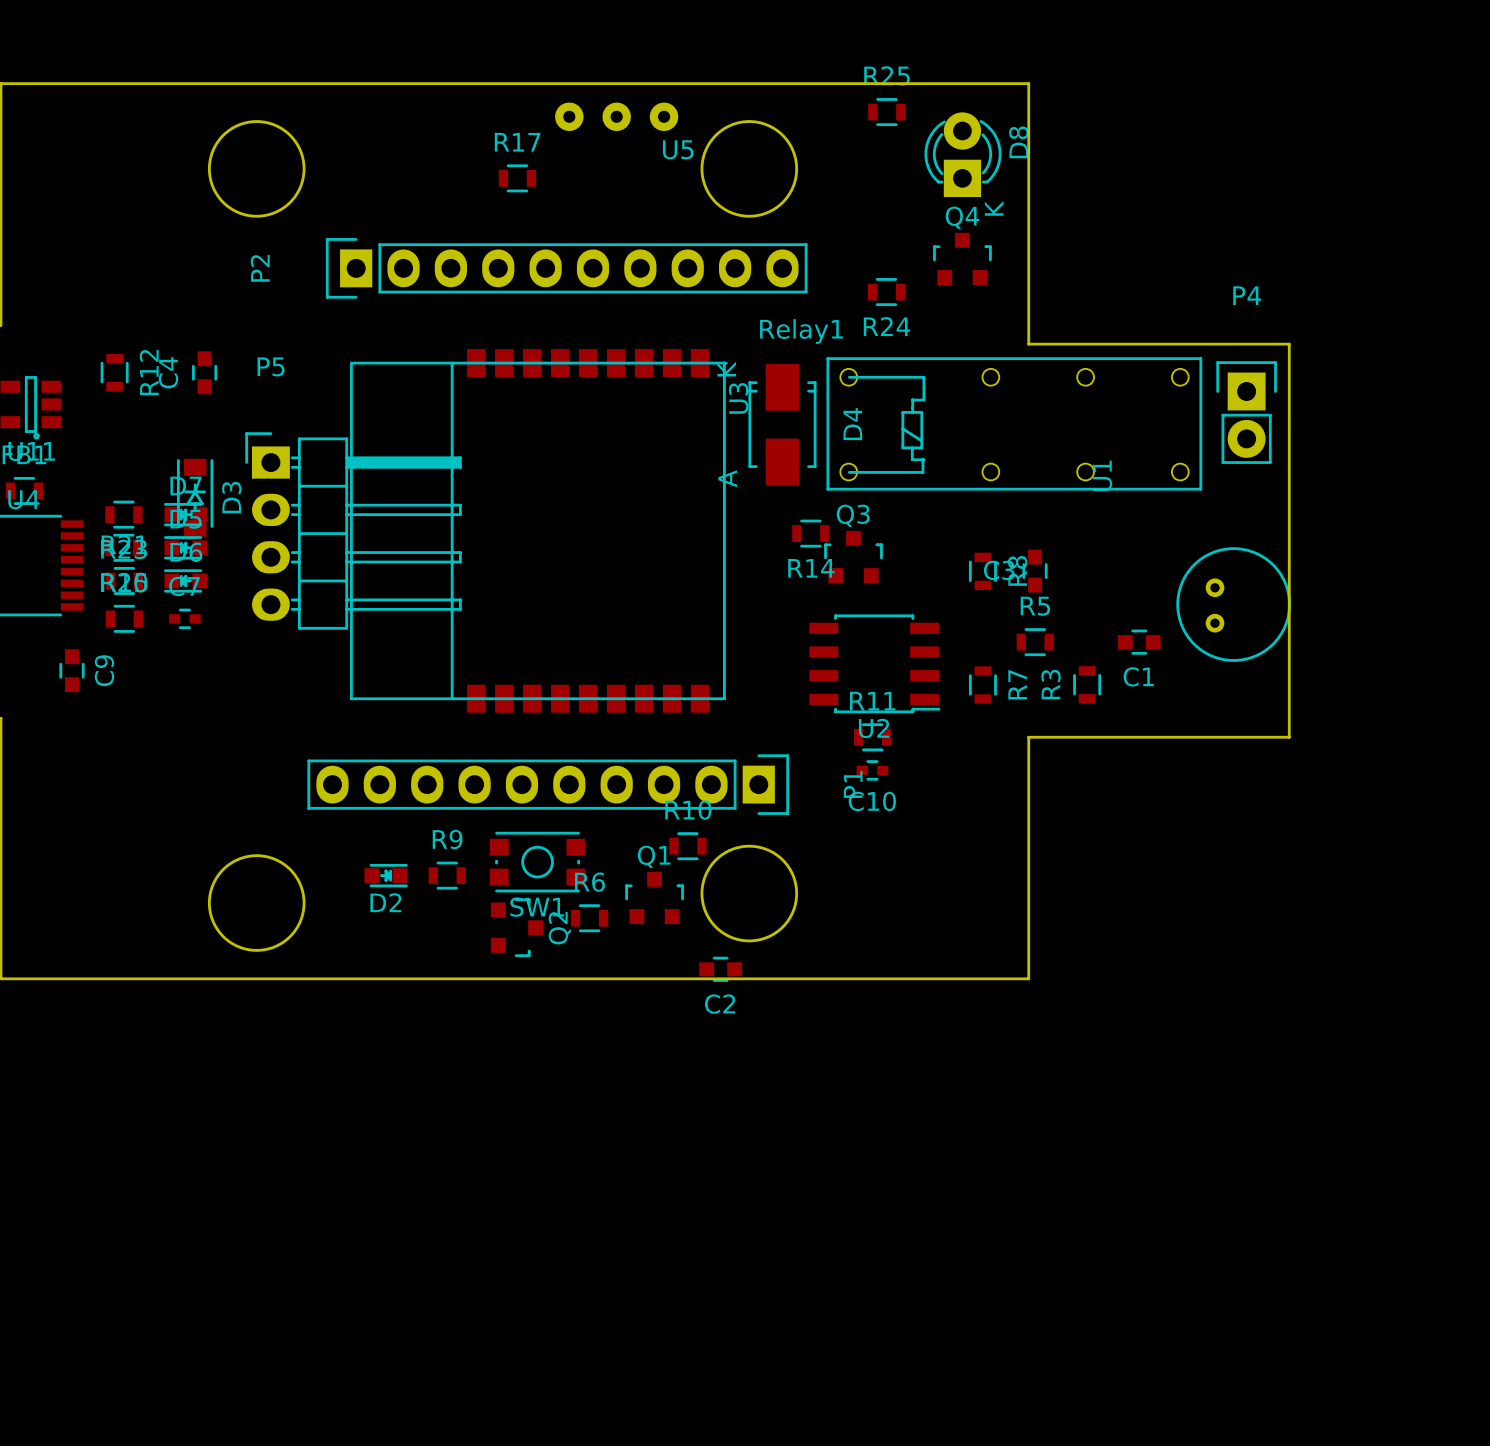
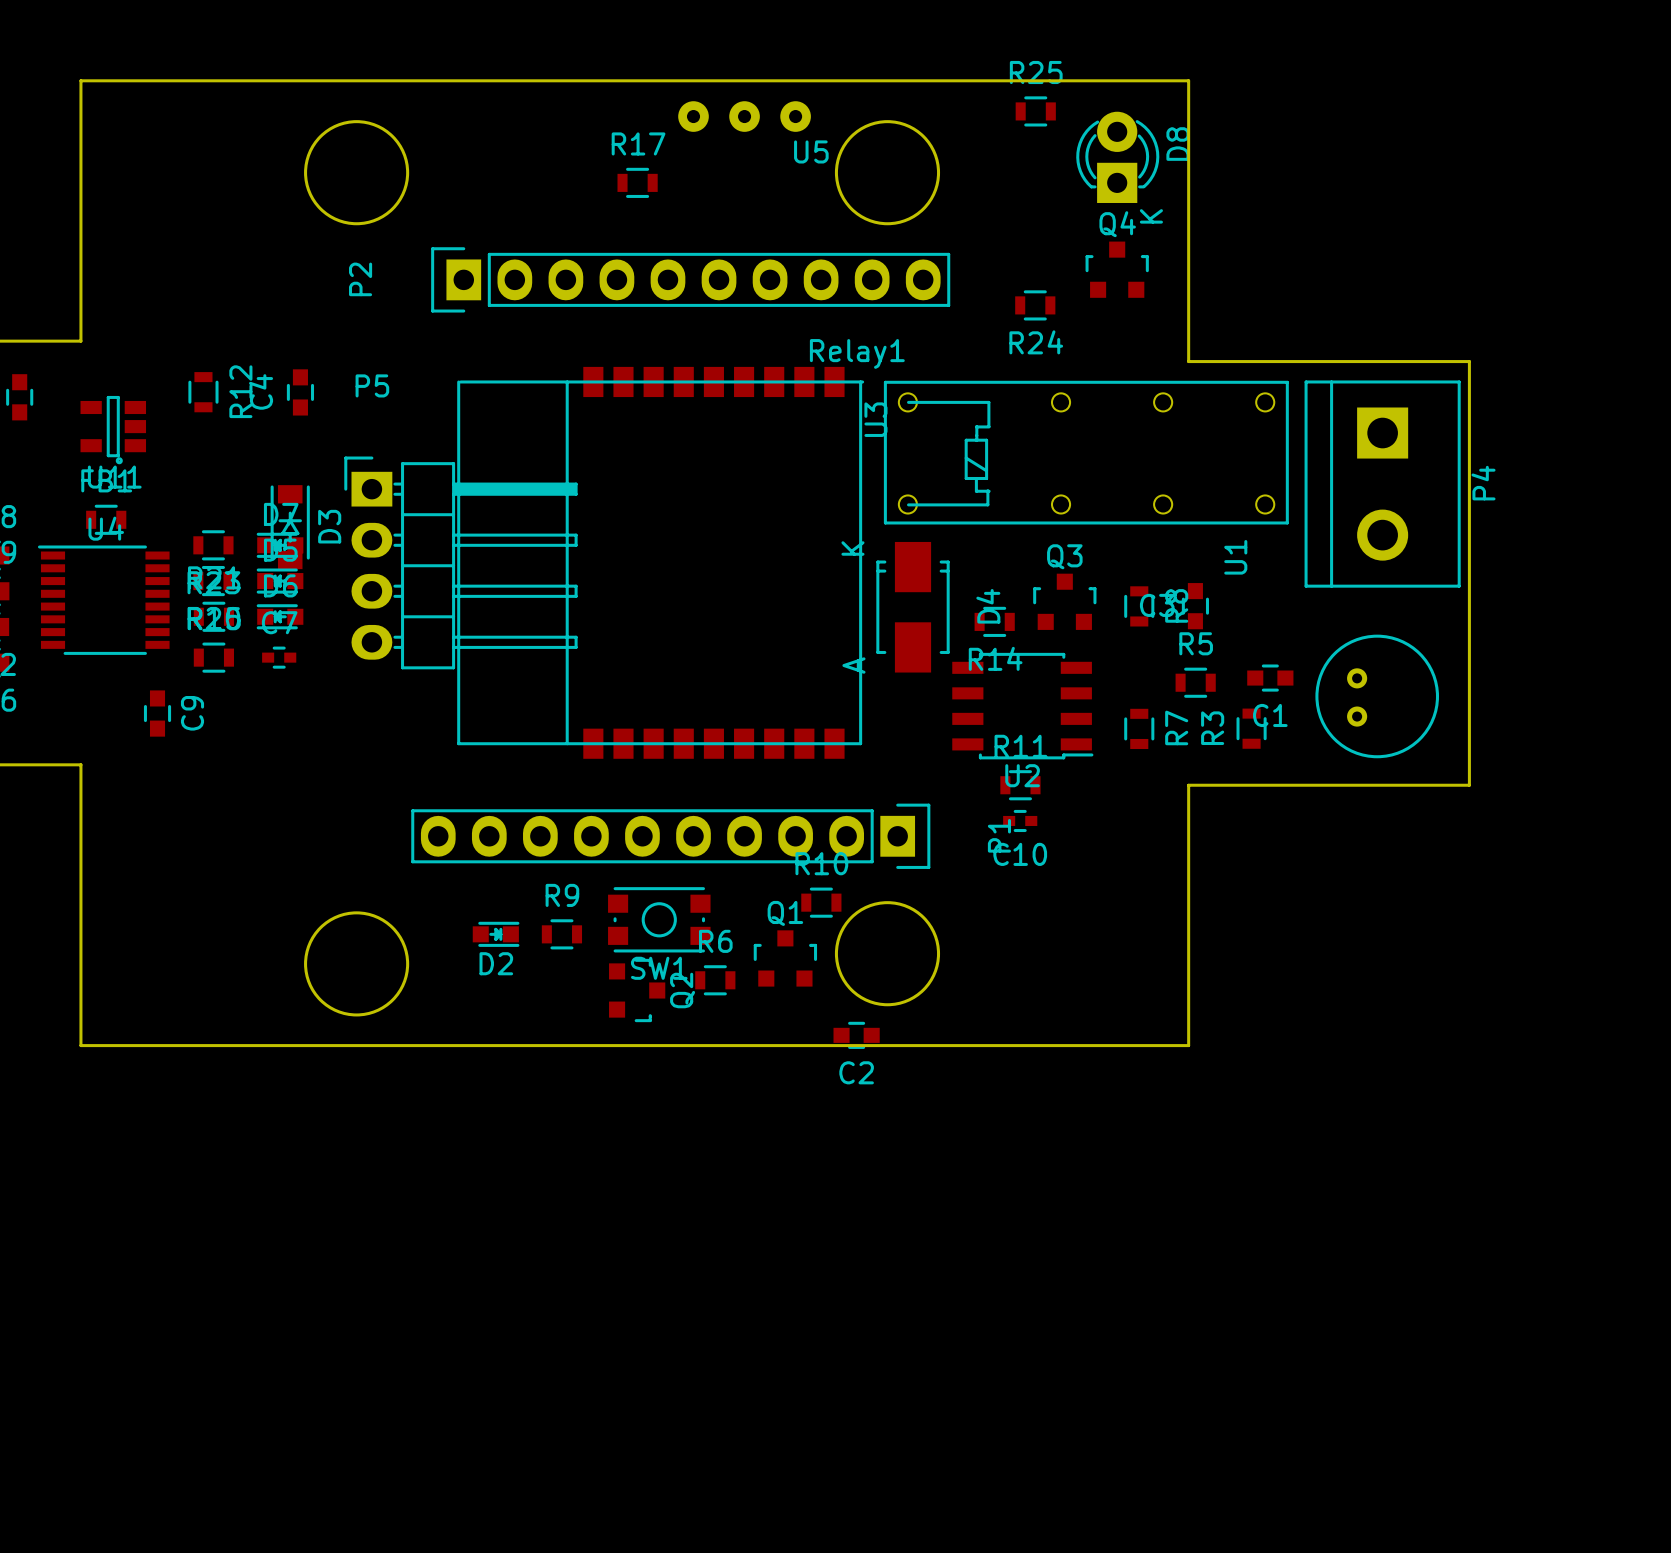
P4 name position: P4 (1247, 295) -> P4 (1483, 483)
P4 footprint: [1216, 361, 1277, 464] -> [1304, 380, 1461, 588]
Relay1 position: (1014, 423) -> (1086, 452)
D4 position: (782, 424) -> (913, 607)
R14 position: (810, 533) -> (994, 621)
Q3 position: (853, 556) -> (1064, 601)
U1 position: (1233, 604) -> (1377, 696)
C1 position: (1139, 642) -> (1270, 678)

